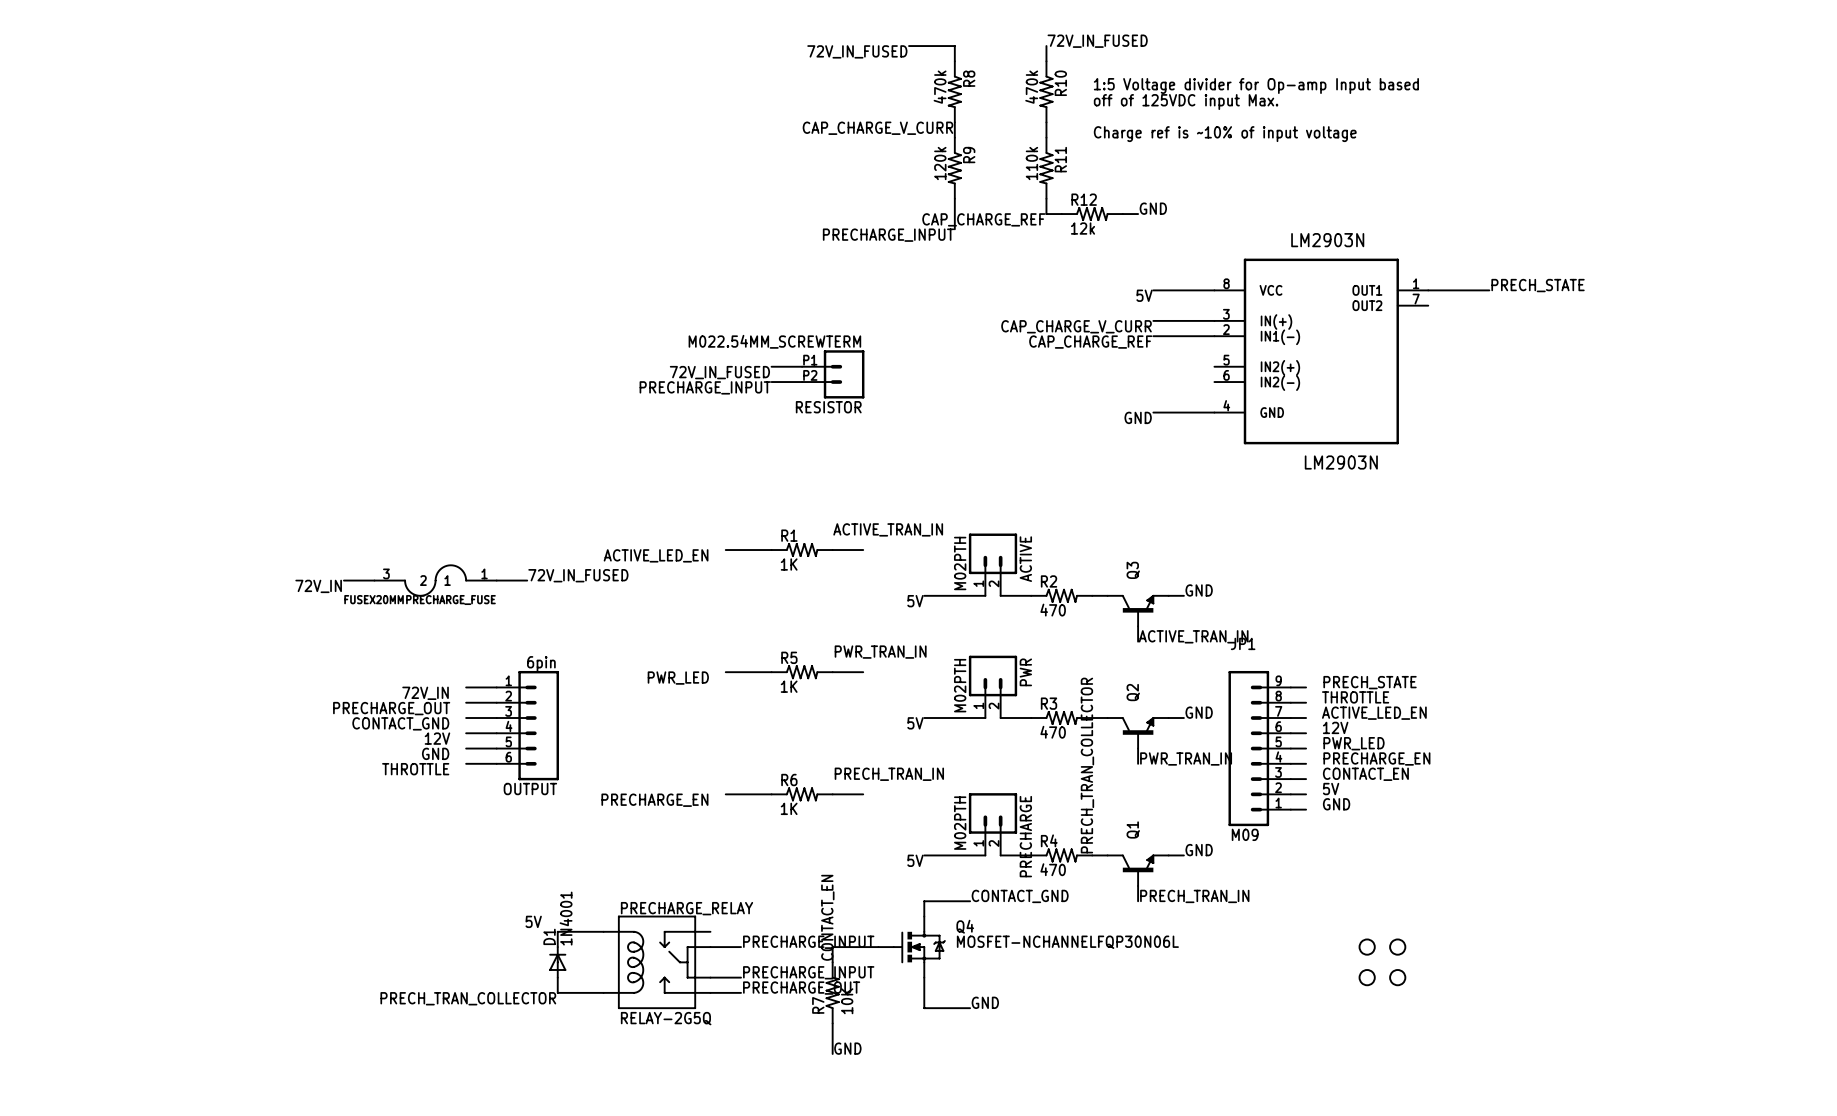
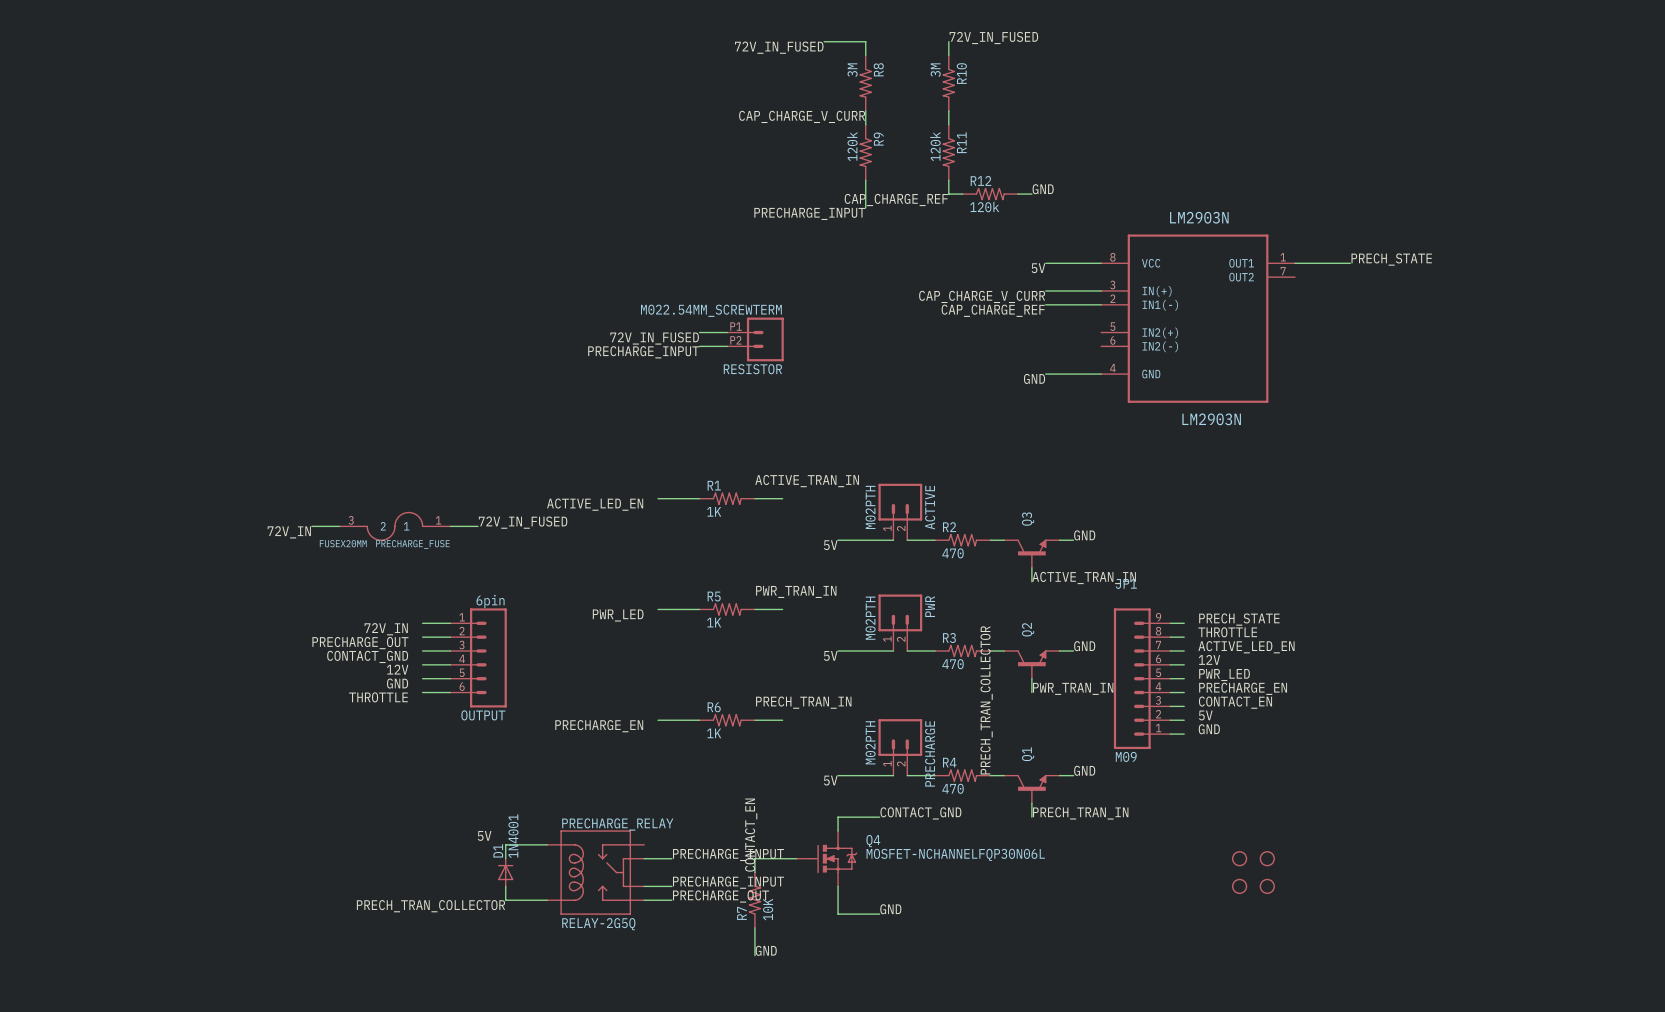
text: 1:5 Voltage divider for Op-amp Input based (1256, 86) -> none
R8 value: 470k (940, 87) -> 3M (852, 70)
R10 value: 470k (1031, 87) -> 3M (935, 70)
text: off of 125VDC input Max. (1186, 102) -> none
text: Charge ref is ~10% of input voltage (1225, 134) -> none
R11 value: 110k (1031, 163) -> 120k (935, 146)
R12 value: 12k (1082, 228) -> 120k (984, 207)

